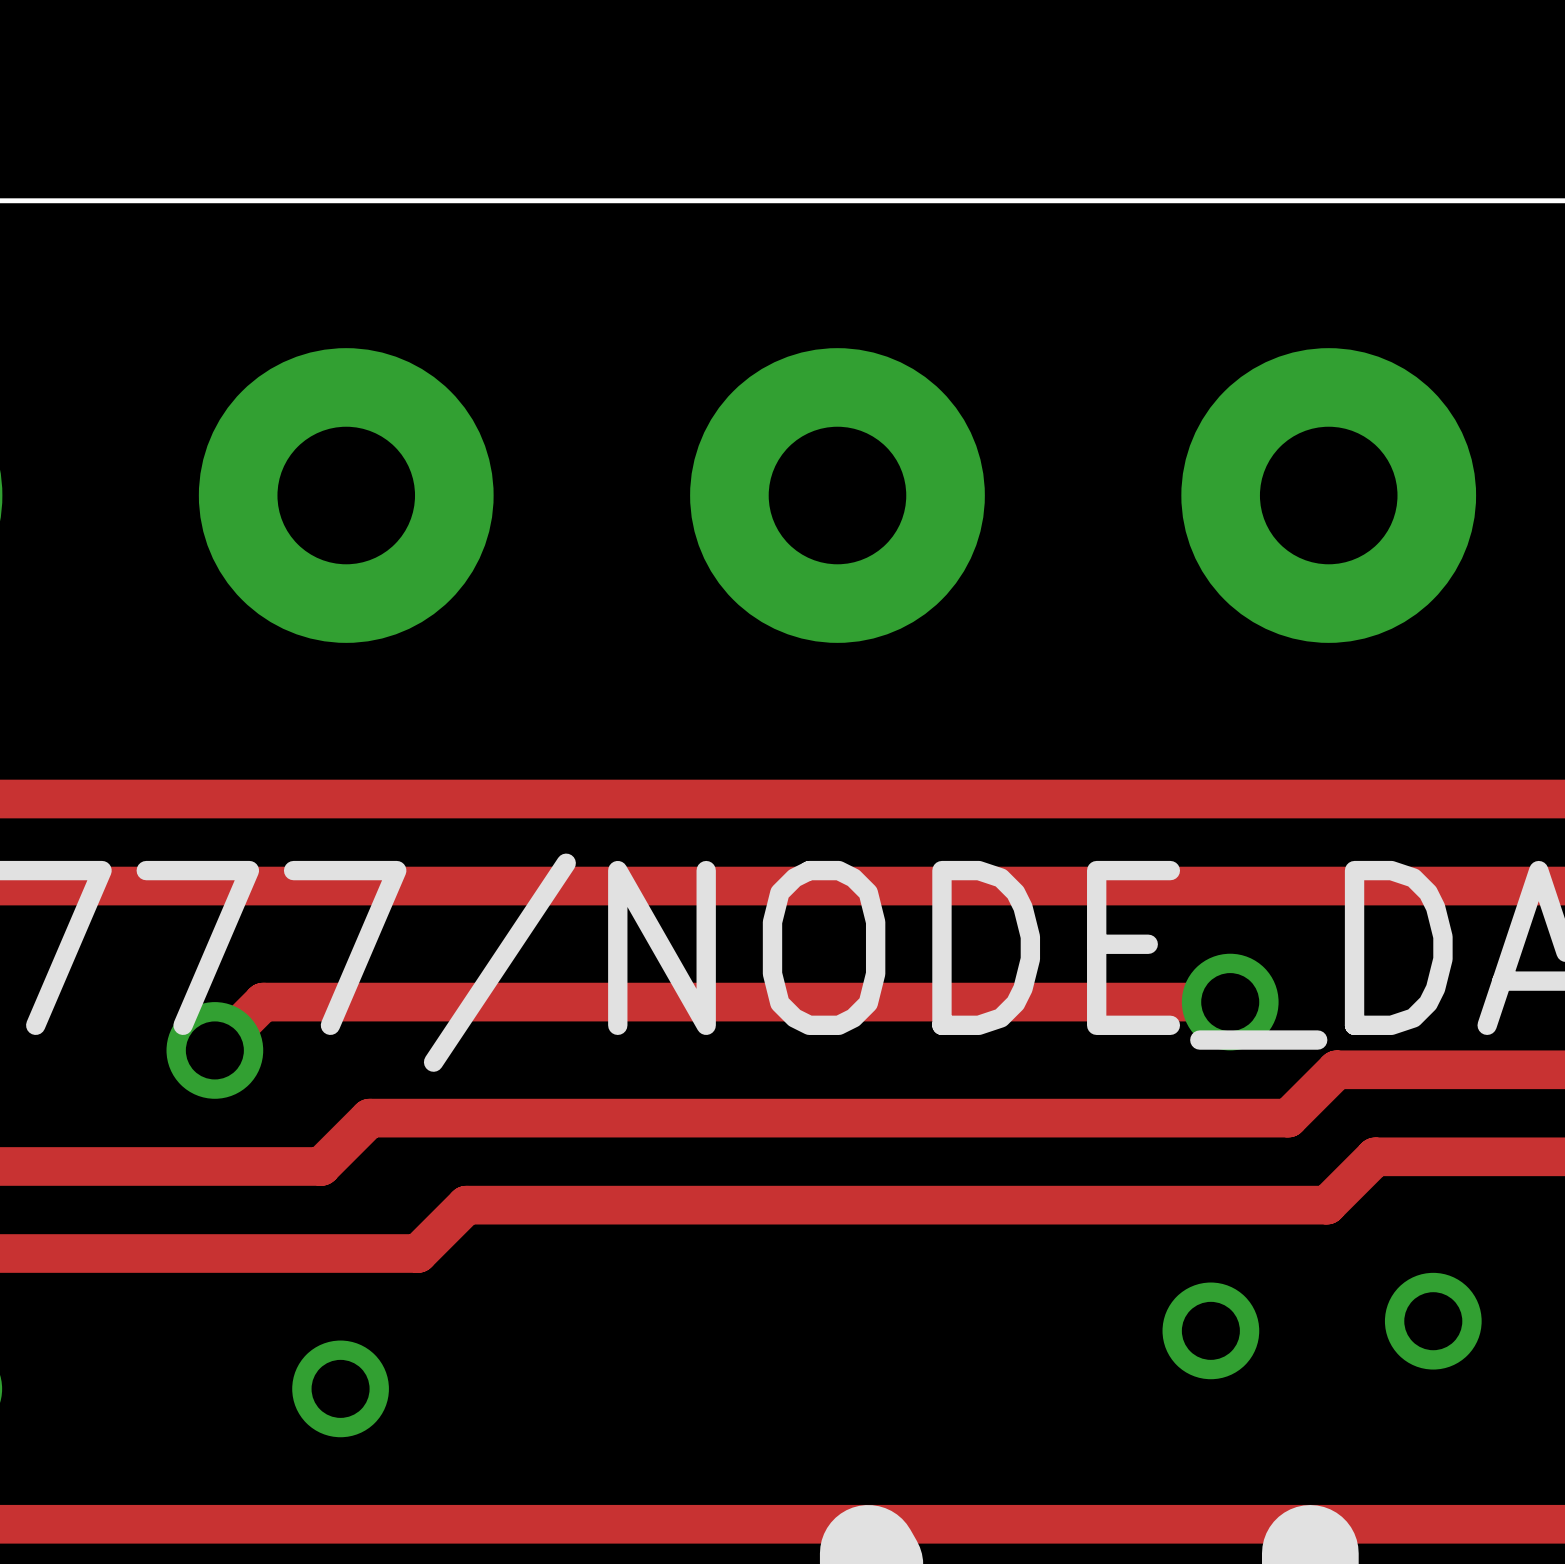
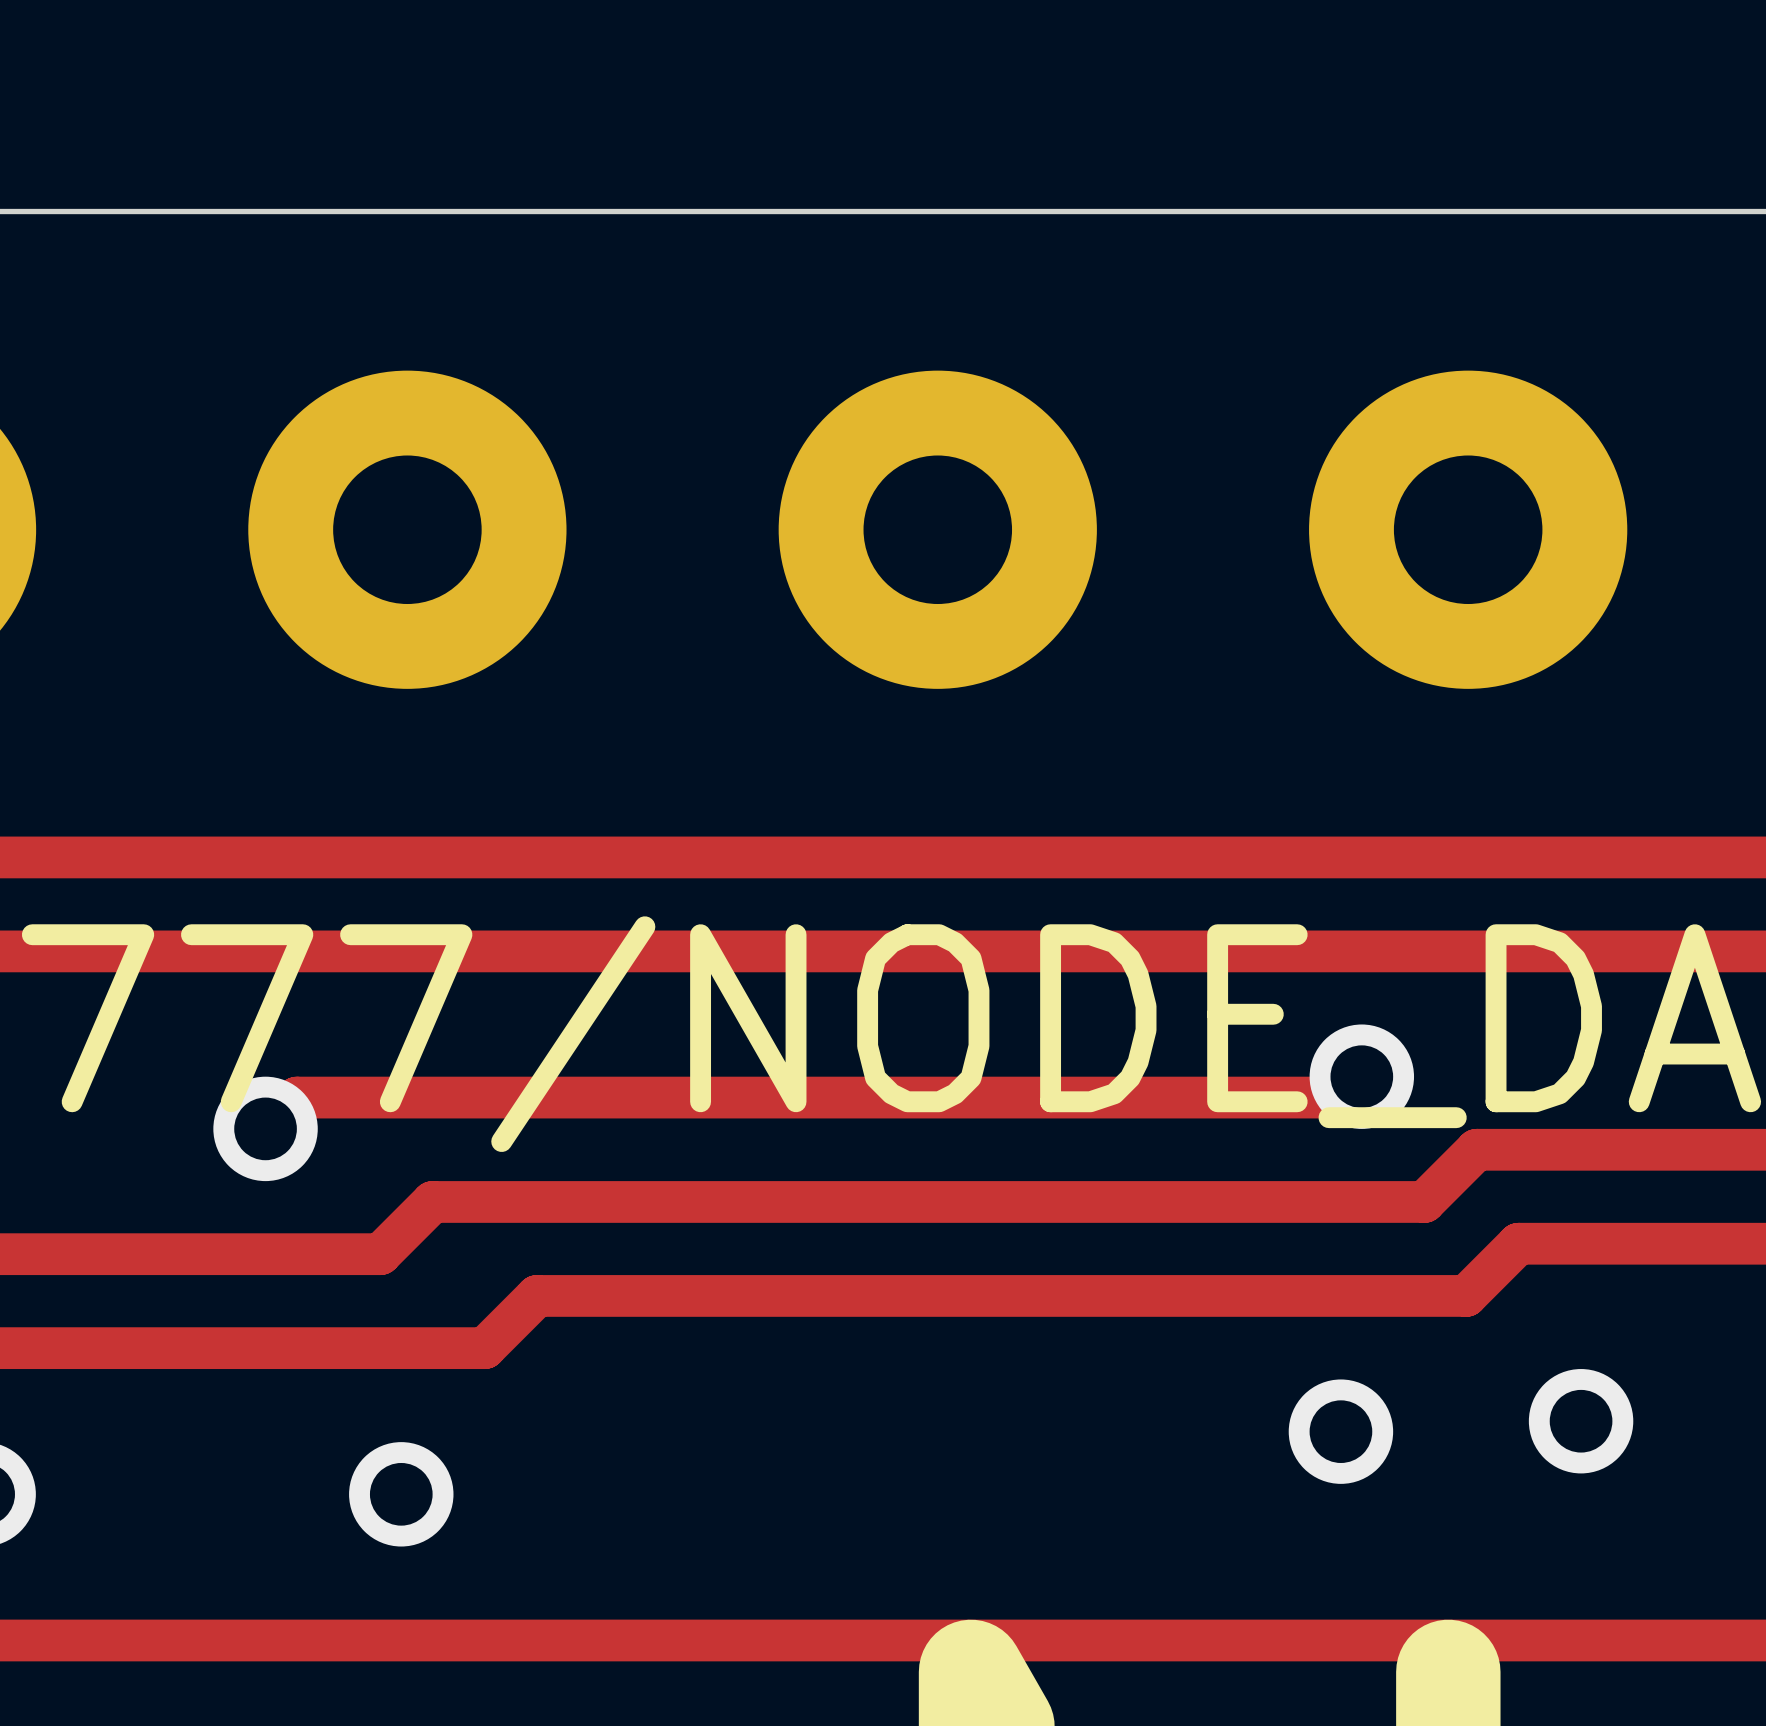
track: (1230, 1002) (263, 1002) (243, 1021) -> (1361, 1076) (1340, 1097) (296, 1097)

